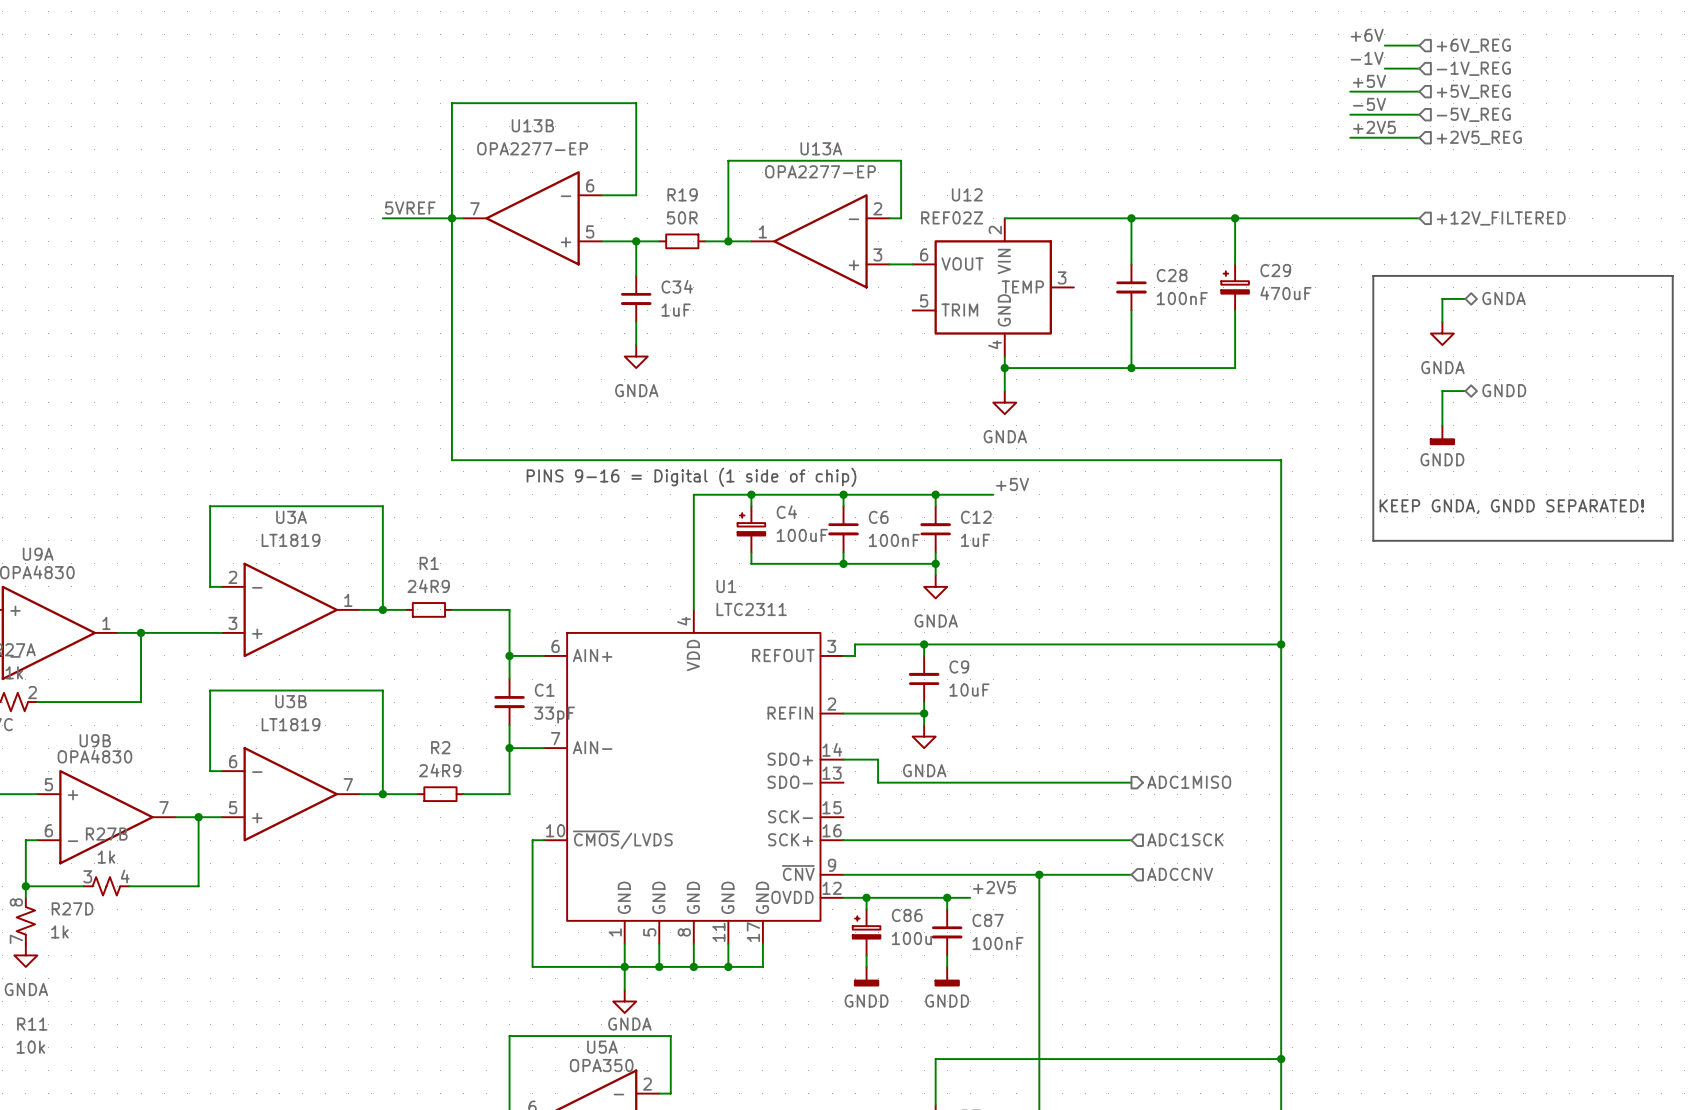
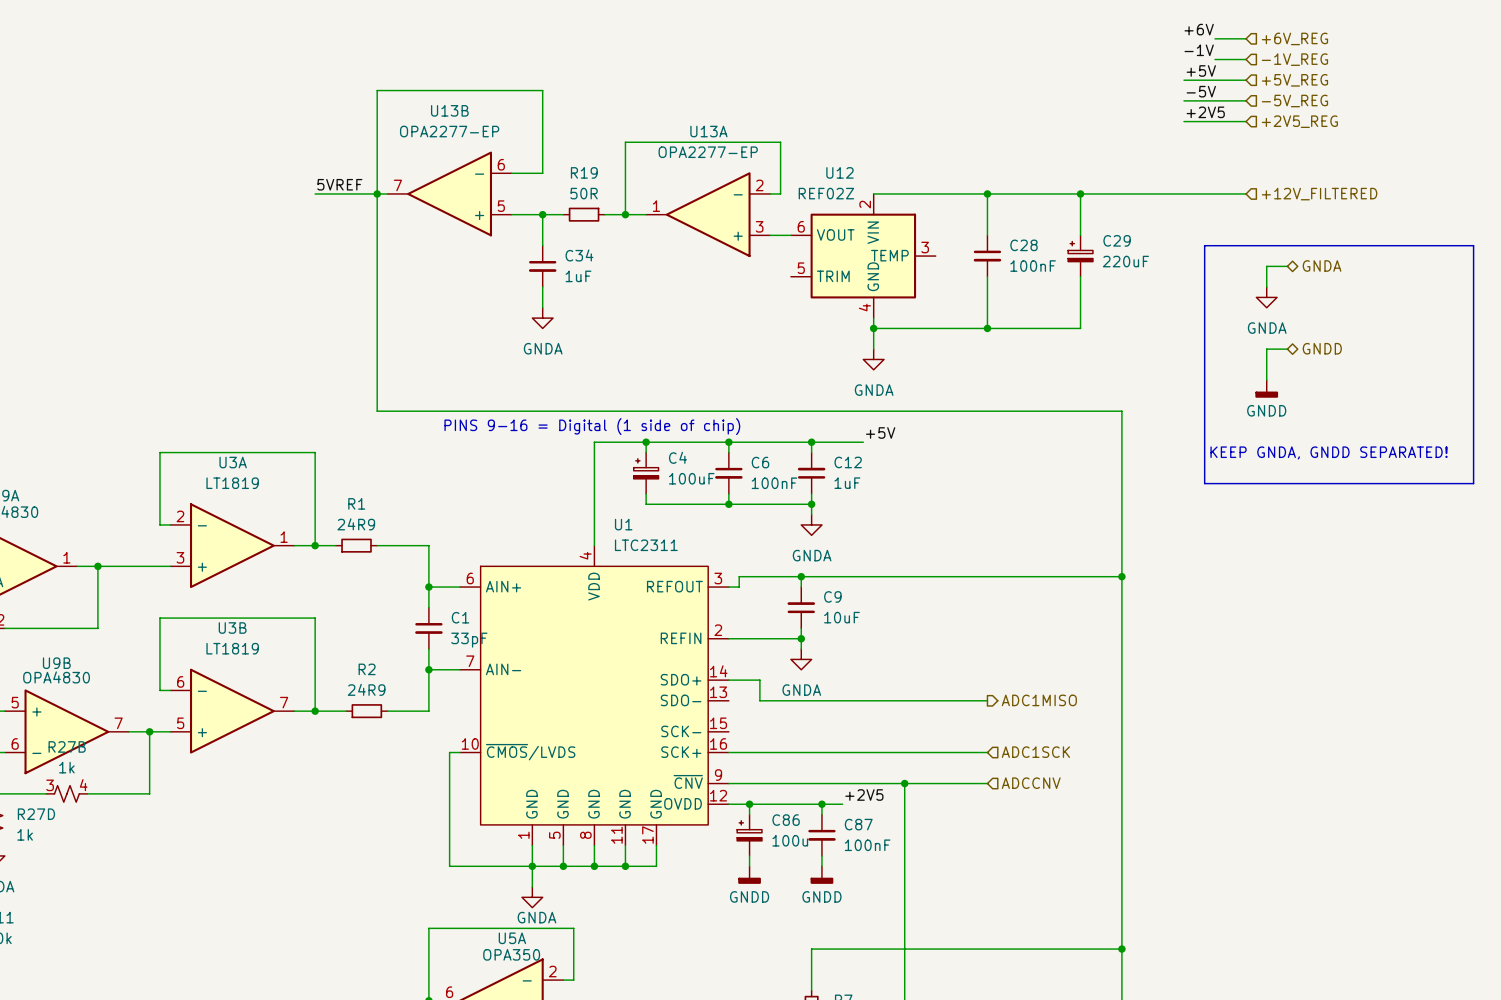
C29 value: 470uF (1285, 293) -> 220uF (1125, 261)

